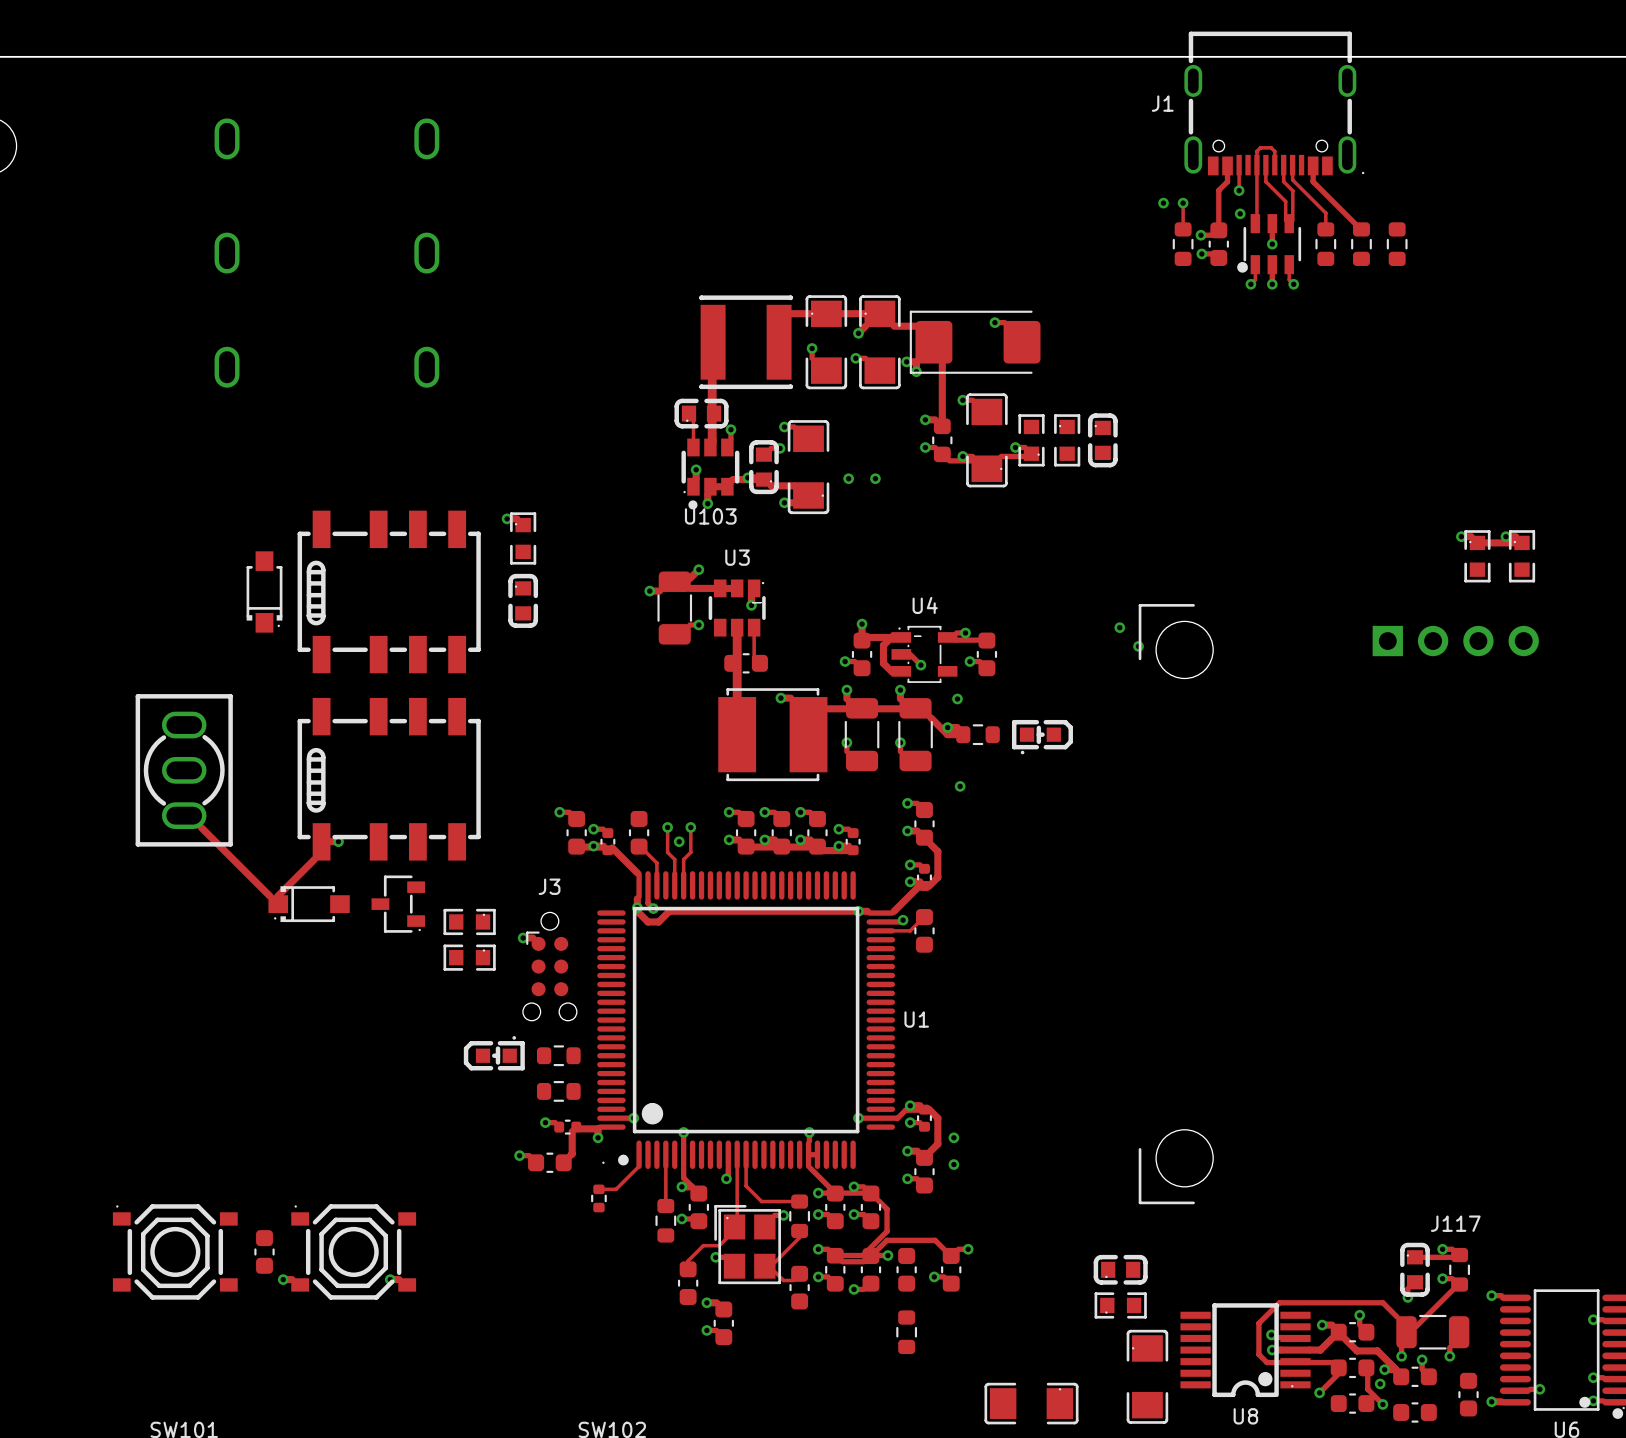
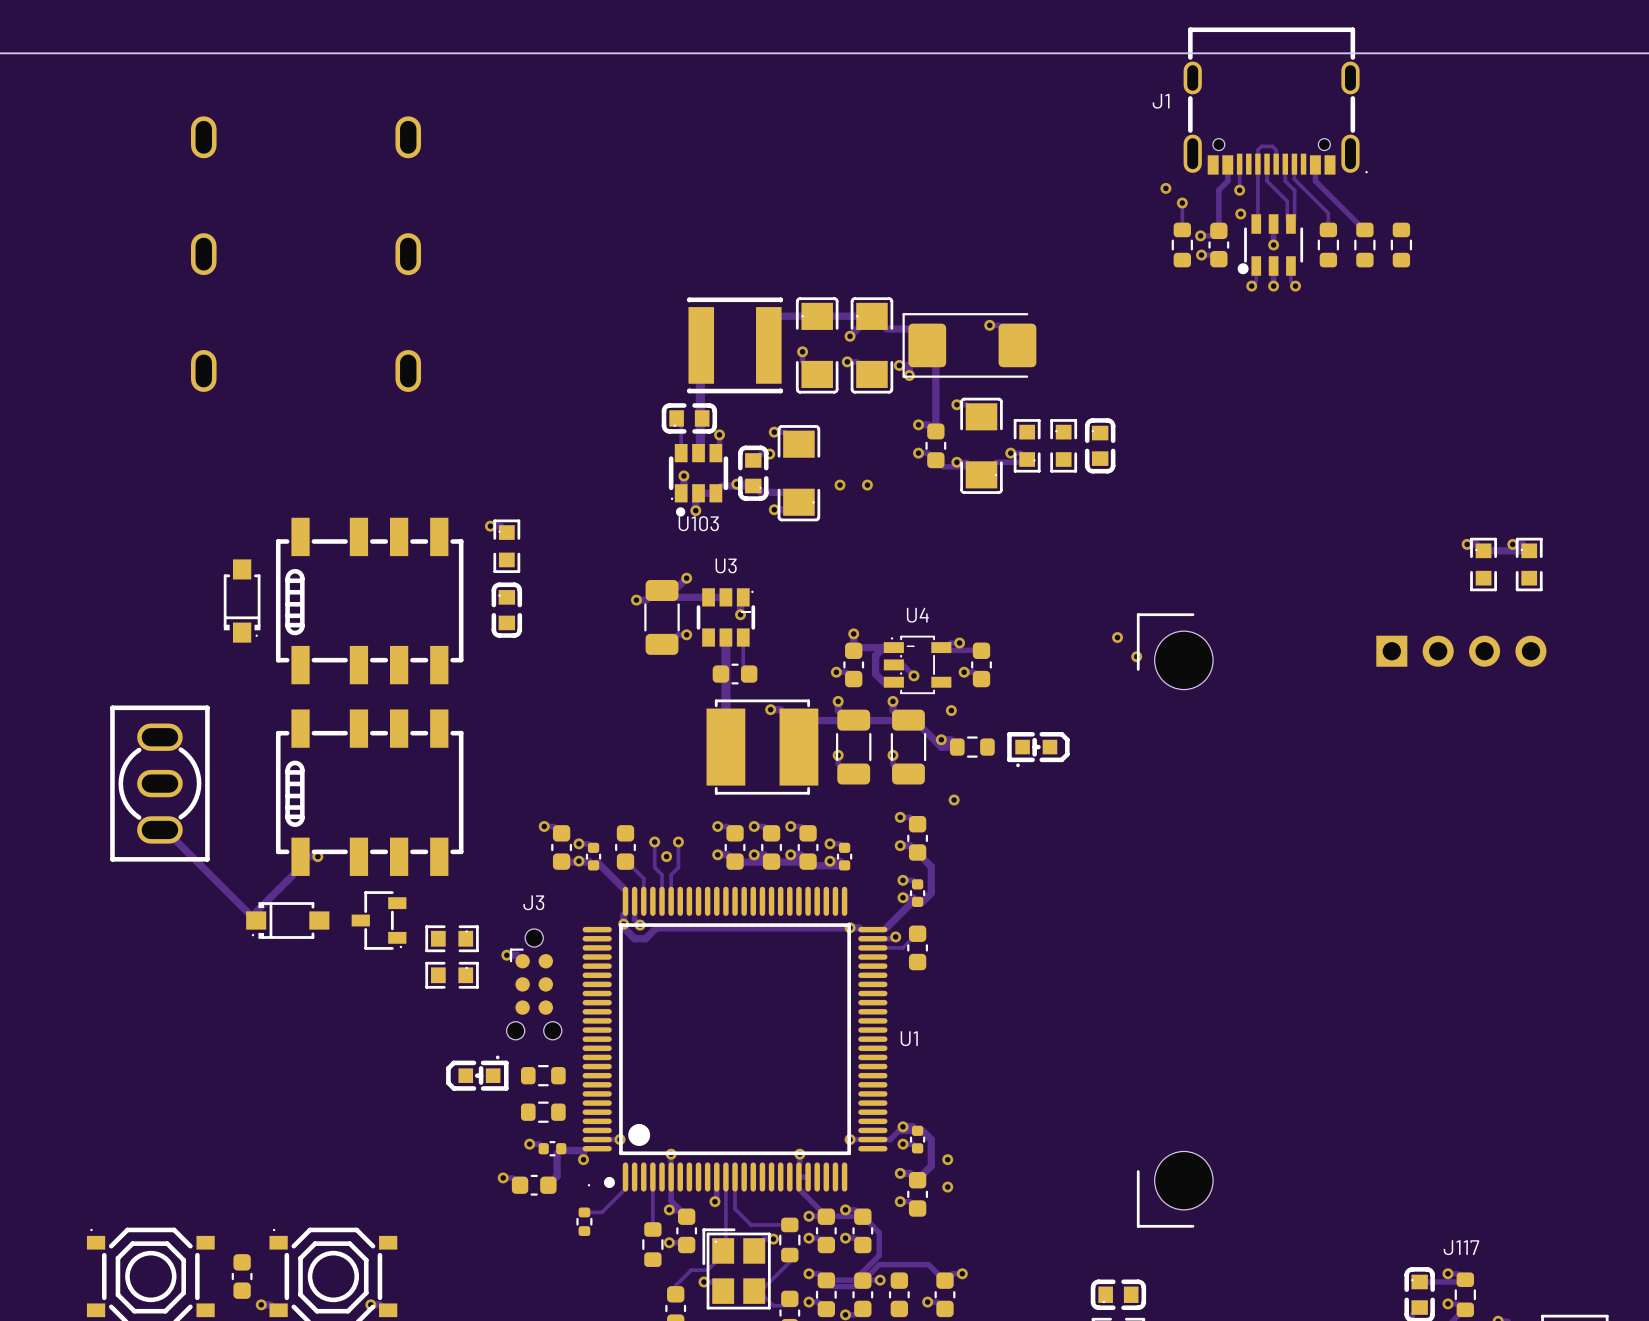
via position: (1163, 203) -> (1165, 188)

